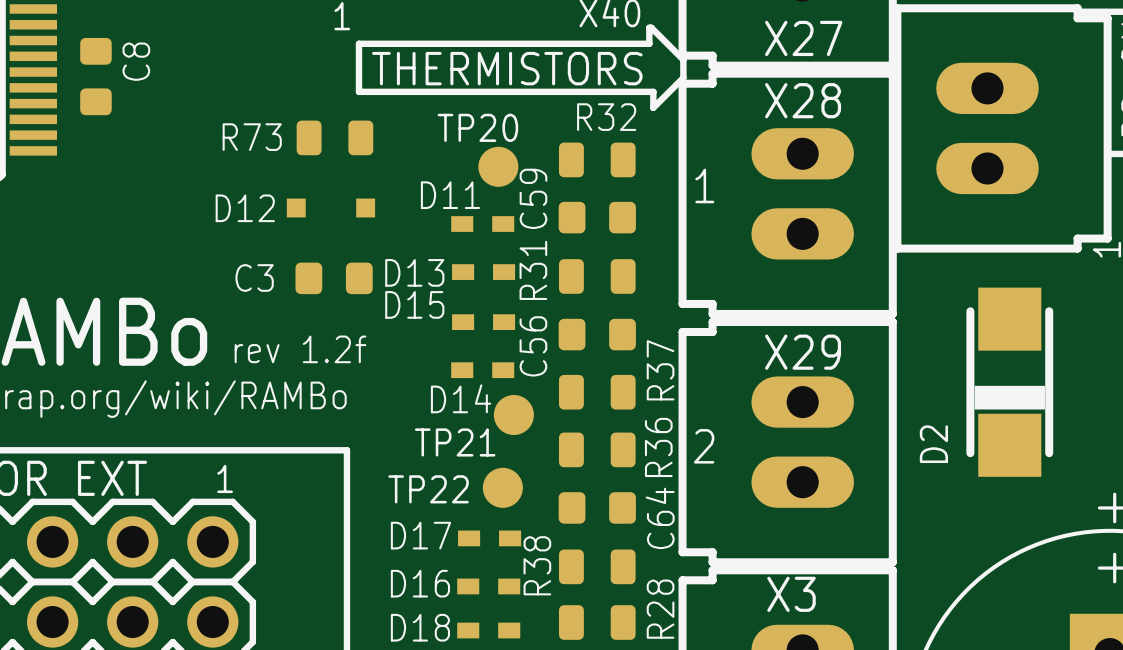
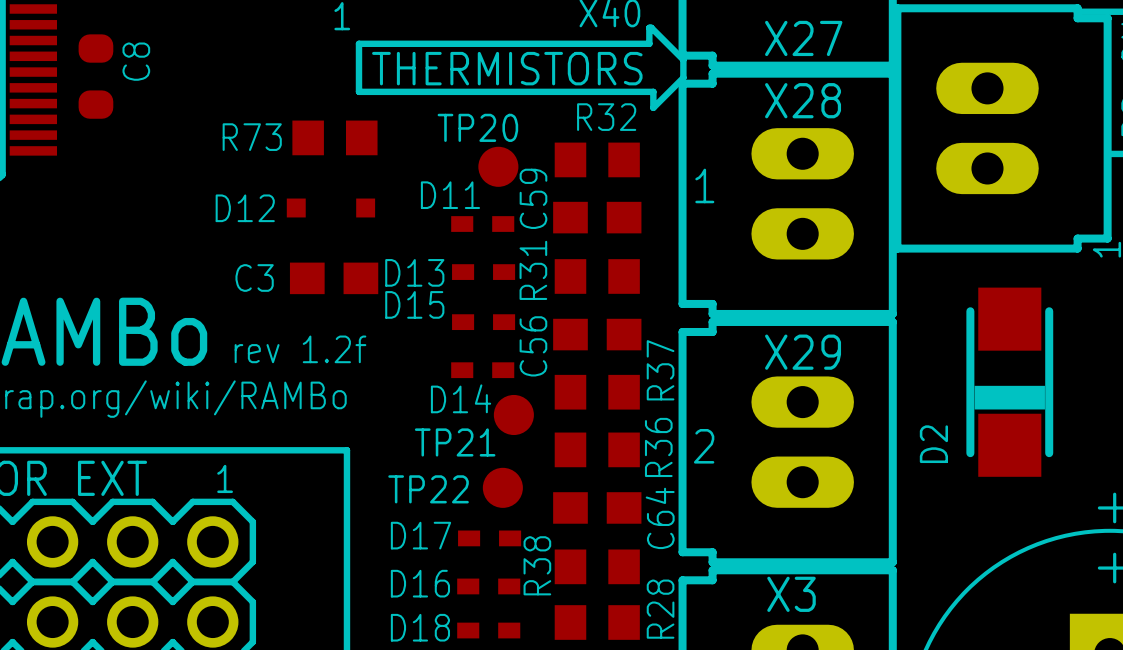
C8 footprint: [80, 37, 112, 116] -> [78, 34, 114, 119]
R73 footprint: [296, 120, 374, 156] -> [292, 120, 378, 156]
R32 footprint: [558, 142, 636, 178] -> [554, 142, 640, 178]
C59 footprint: [558, 201, 636, 234] -> [553, 201, 642, 234]
R31 footprint: [558, 259, 636, 294] -> [554, 259, 640, 294]
C3 footprint: [295, 262, 373, 295] -> [289, 262, 379, 295]
C56 footprint: [558, 318, 636, 351] -> [553, 318, 642, 351]
R37 footprint: [558, 374, 636, 410] -> [554, 374, 640, 410]
R36 footprint: [558, 432, 636, 468] -> [554, 432, 640, 468]
C64 footprint: [558, 492, 636, 524] -> [553, 492, 642, 524]
R38 footprint: [558, 549, 636, 585] -> [554, 549, 640, 585]
R28 footprint: [558, 605, 636, 640] -> [554, 605, 640, 640]

